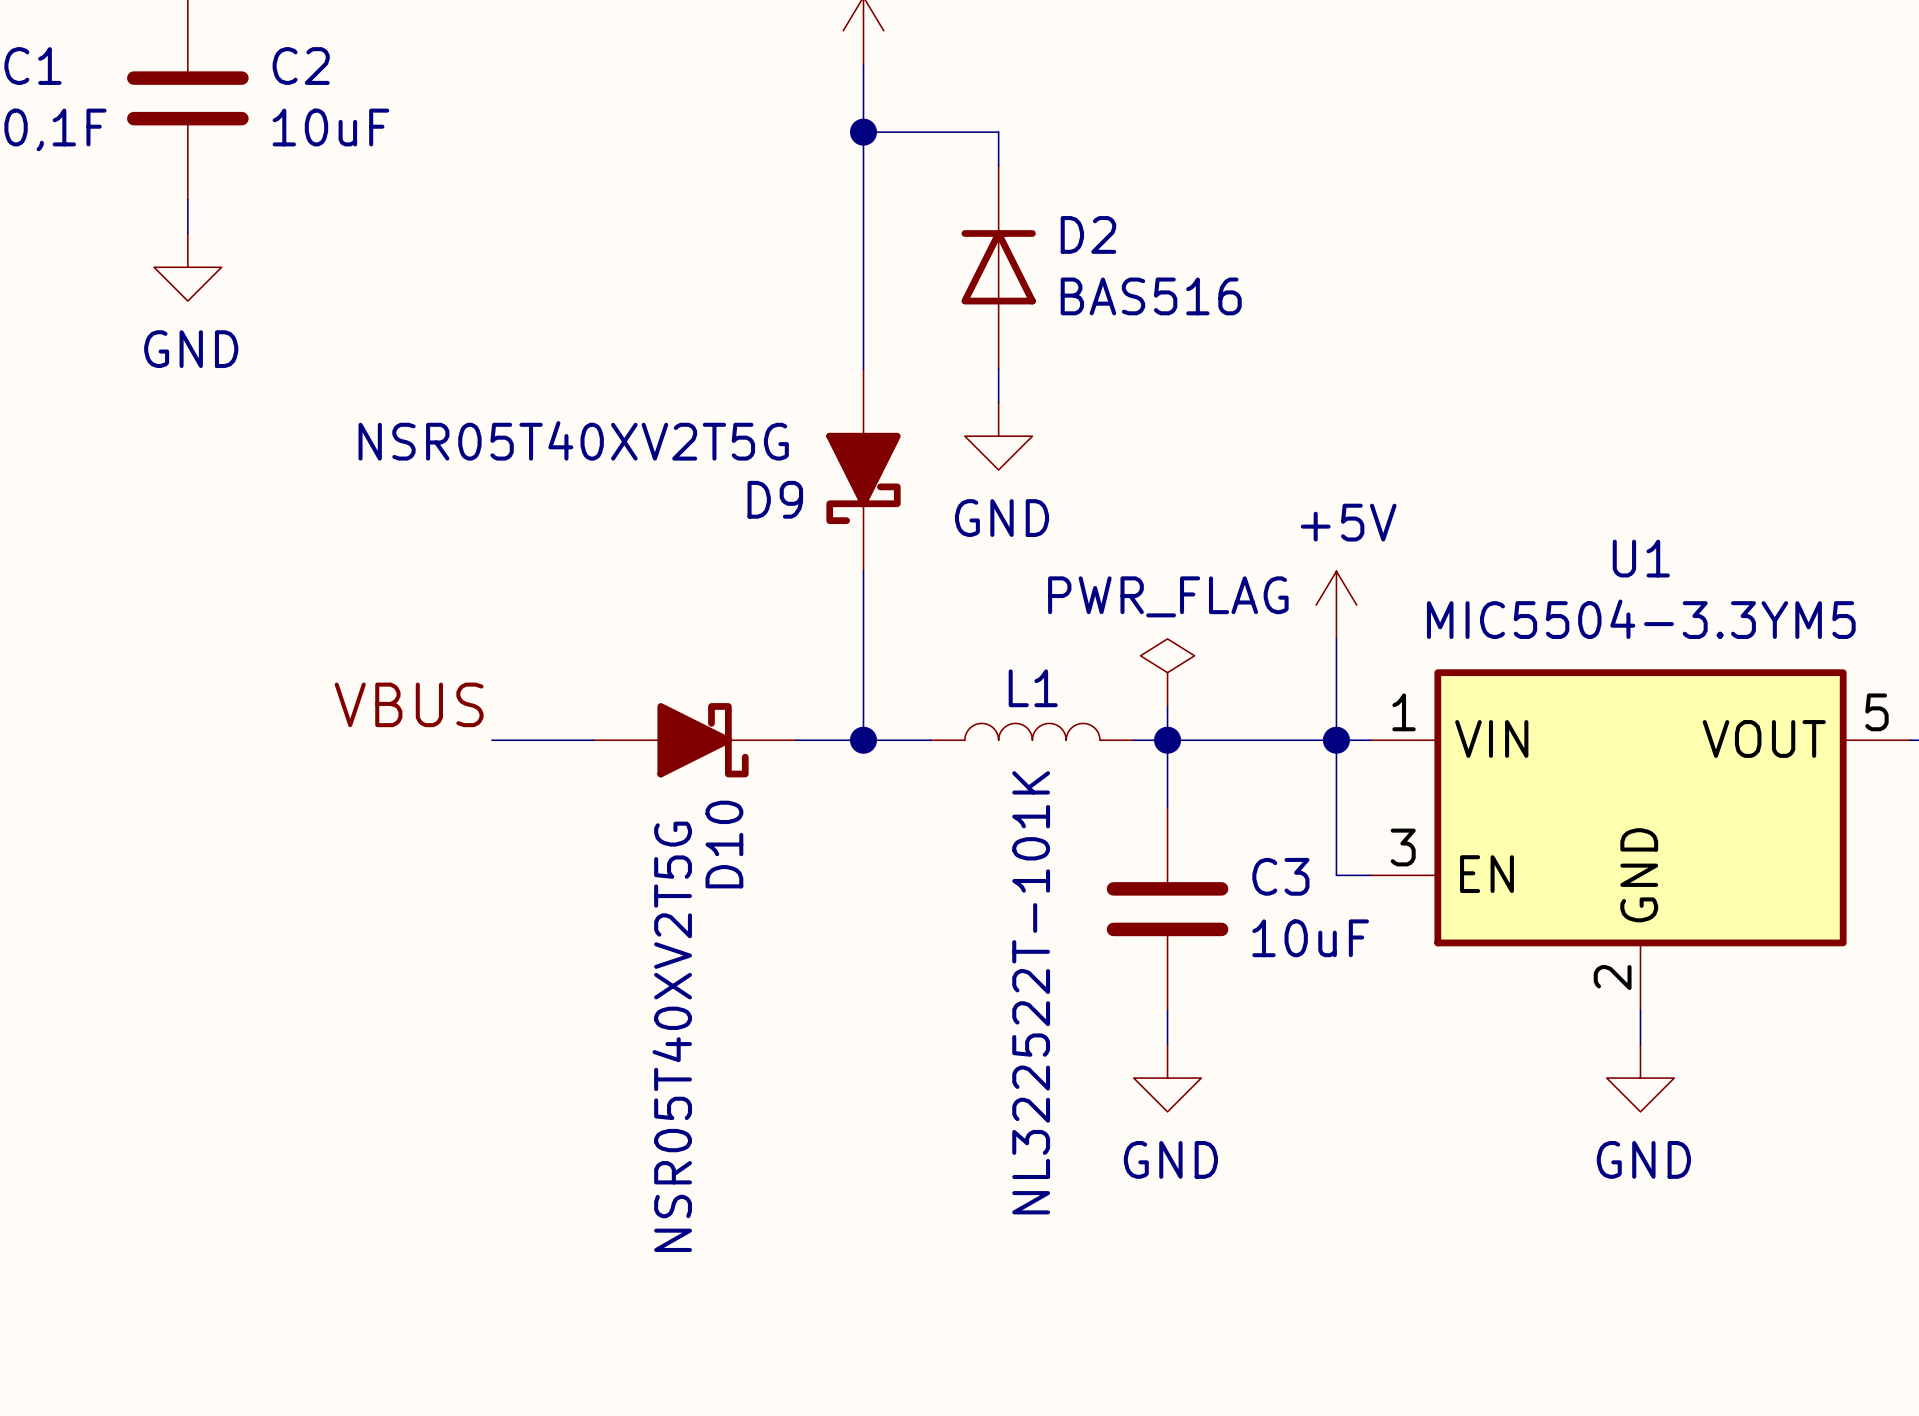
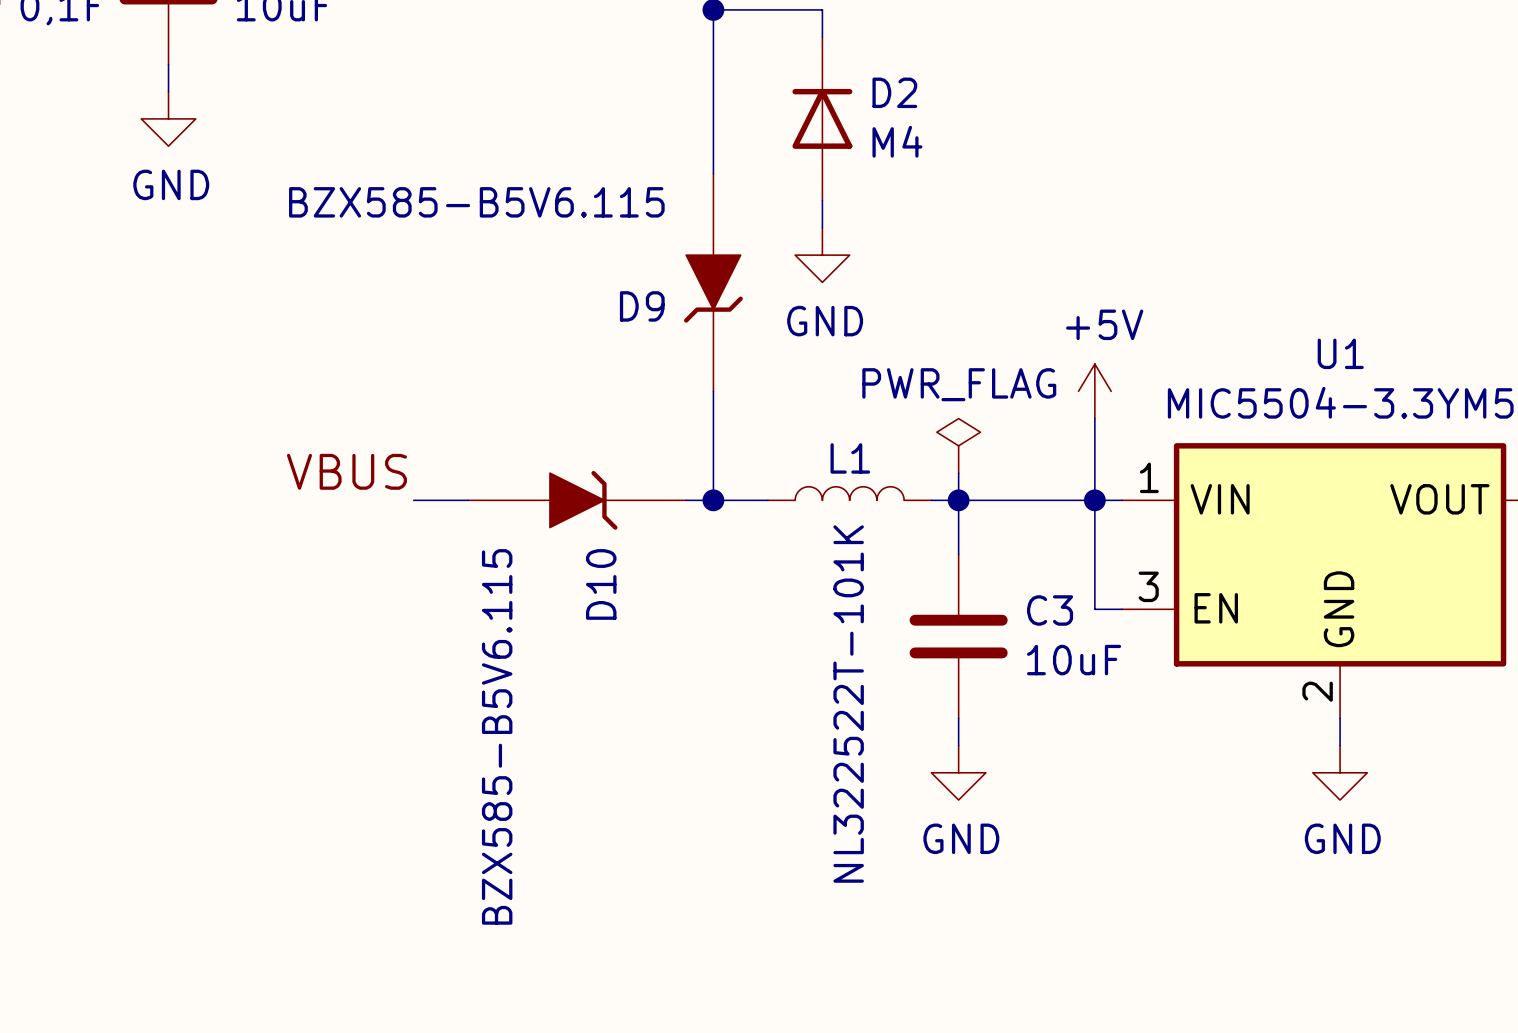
D2 value: BAS516 (1151, 296) -> M4 (897, 141)
D9 symbol: [826, 368, 901, 572] -> [684, 173, 743, 392]
D9 value: NSR05T40XV2T5G (573, 440) -> BZX585-B5V6.115 (476, 202)
D10 symbol: [593, 703, 796, 778] -> [468, 470, 687, 530]
D10 value: NSR05T40XV2T5G (672, 1036) -> BZX585-B5V6.115 (497, 736)

